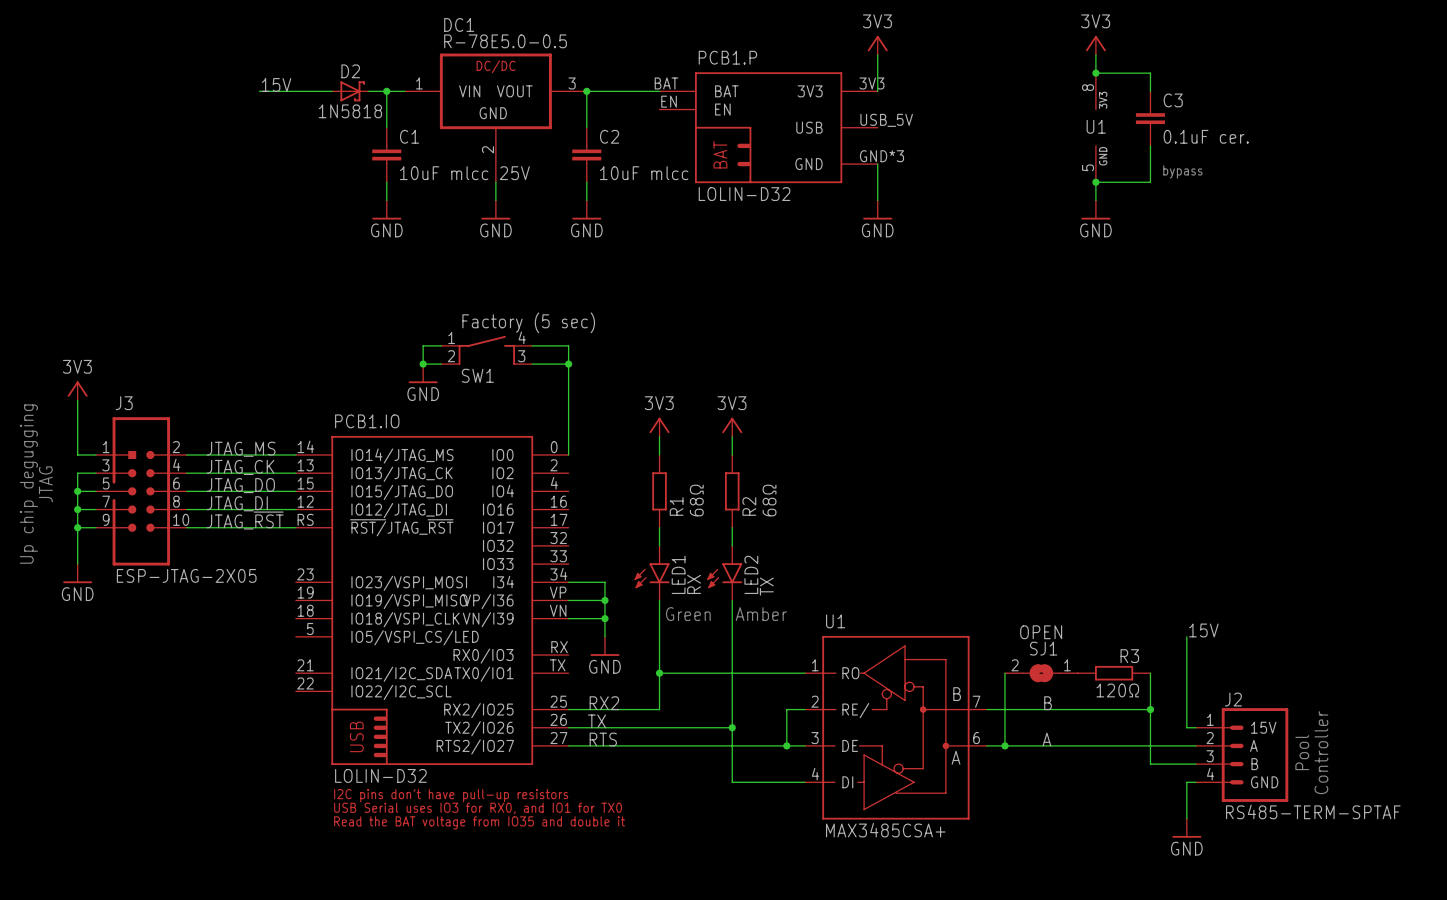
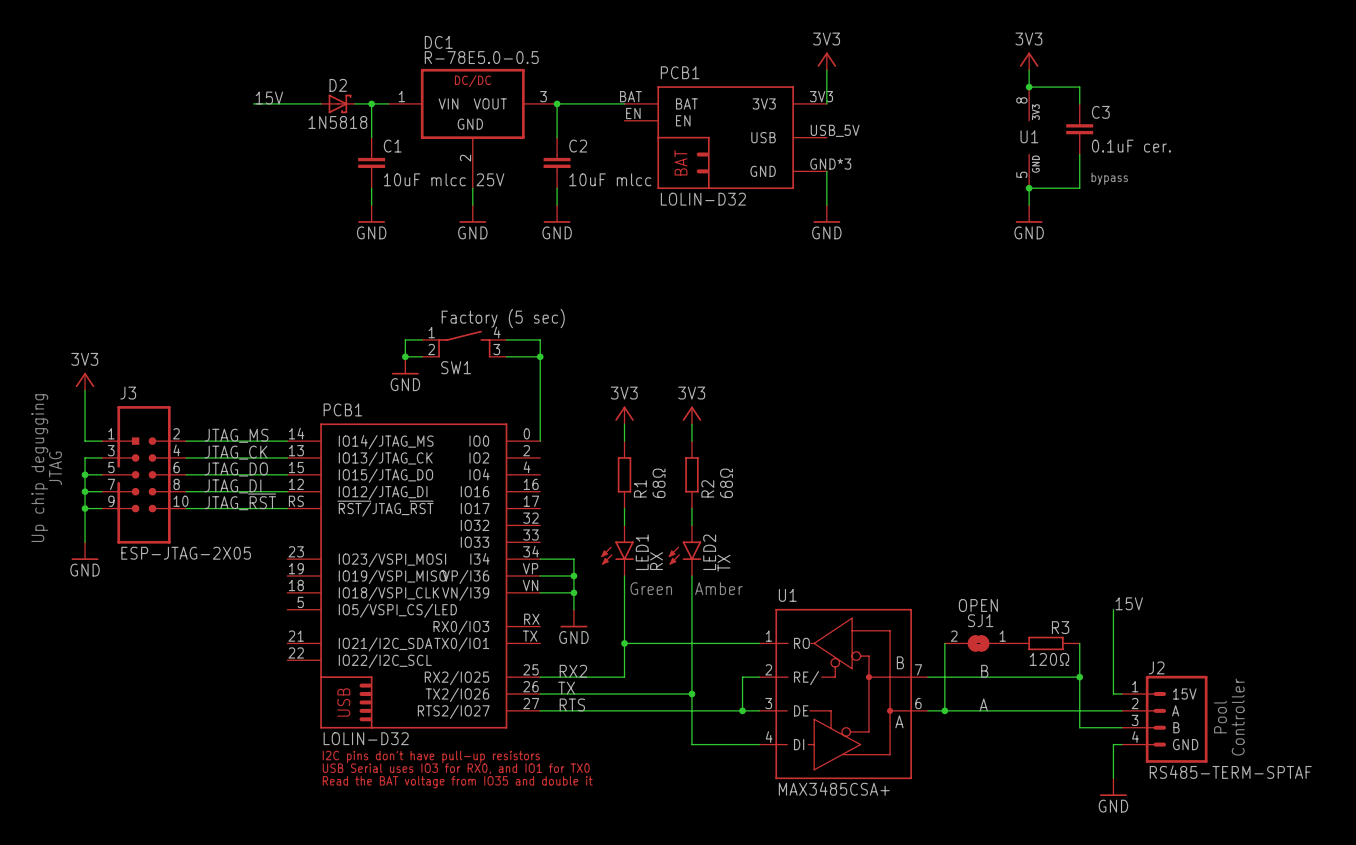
PCB1.P name: PCB1.P (727, 57) -> PCB1 (680, 72)
PCB1.IO name: PCB1.IO (367, 421) -> PCB1 (342, 409)

